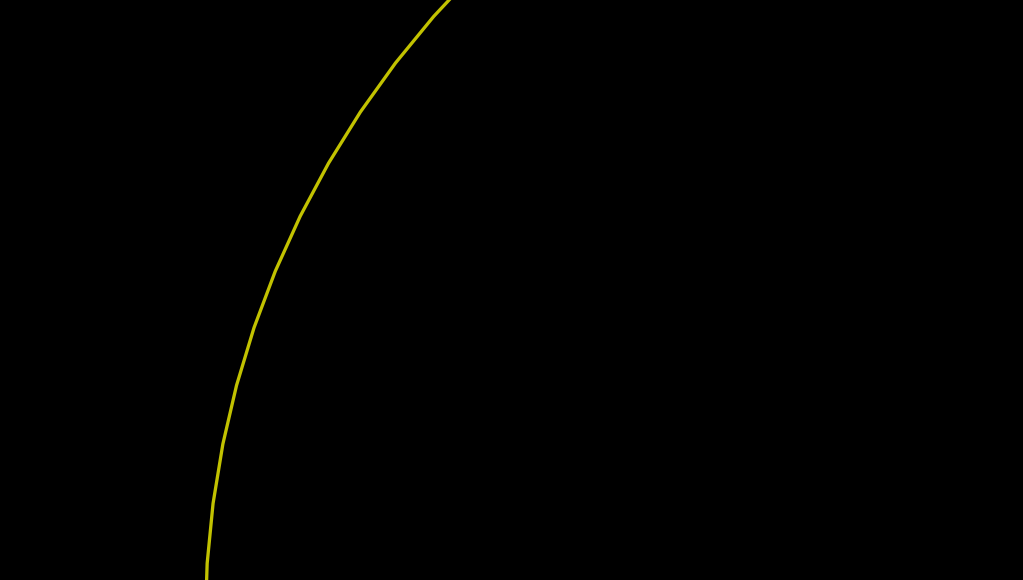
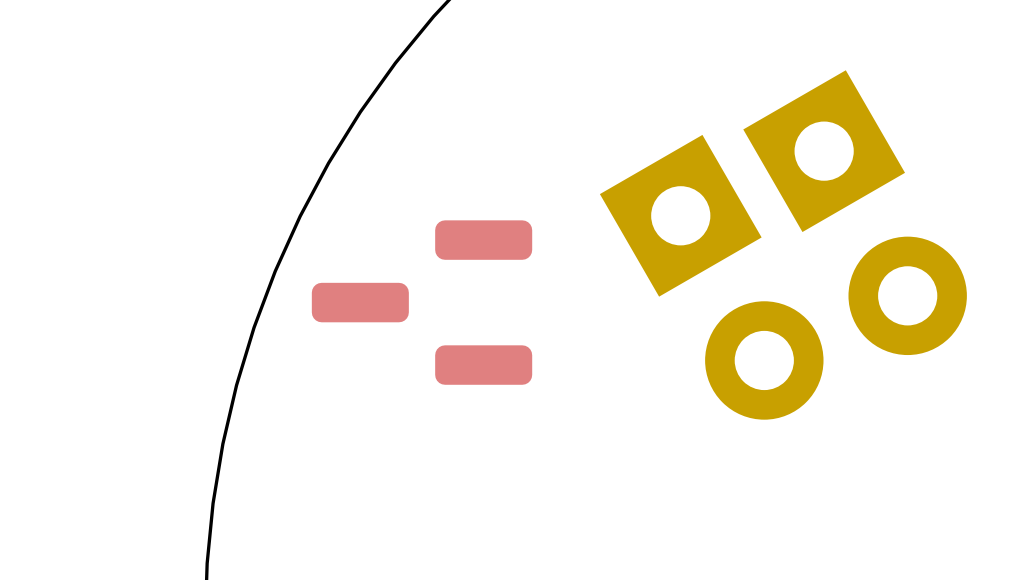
part: none -> (855, 212)
part: none -> (711, 277)
part: none -> (422, 302)

